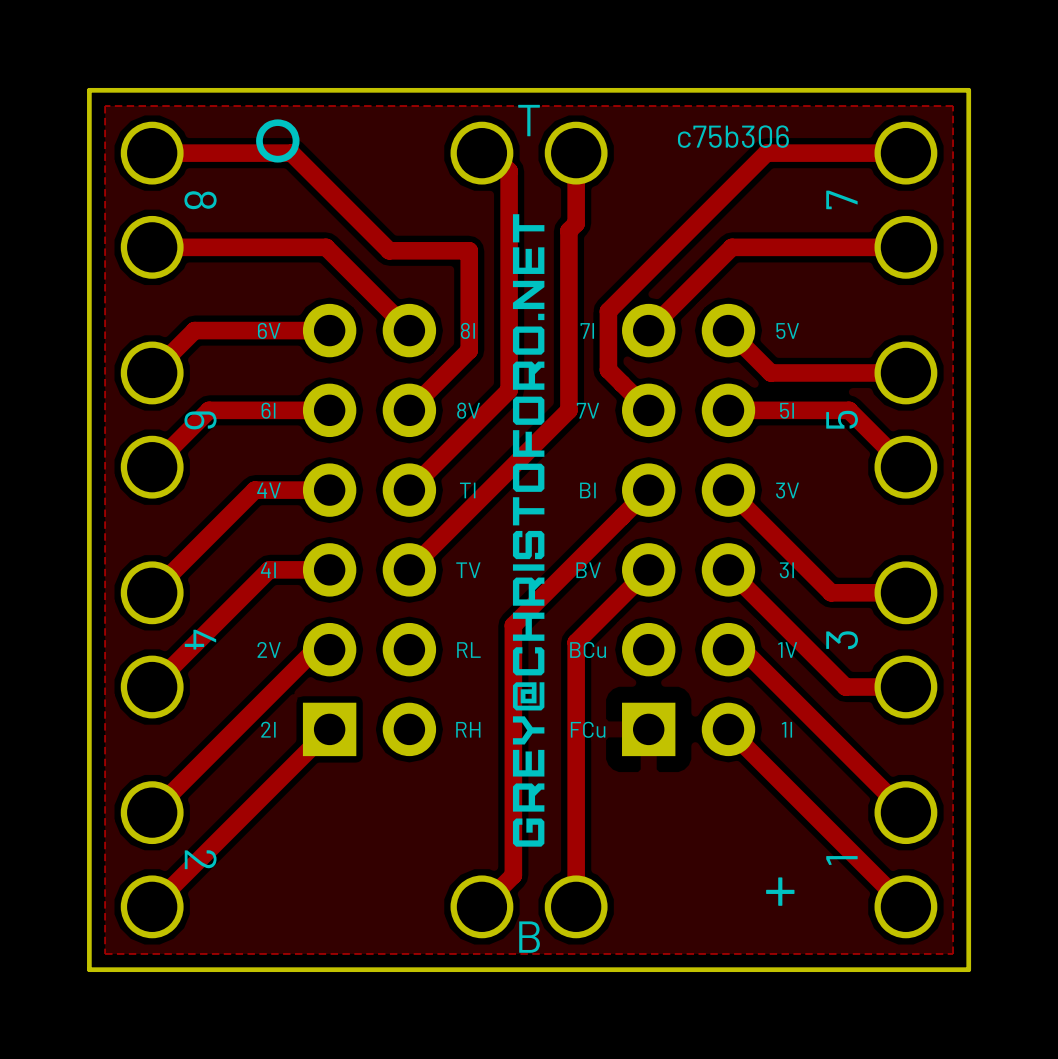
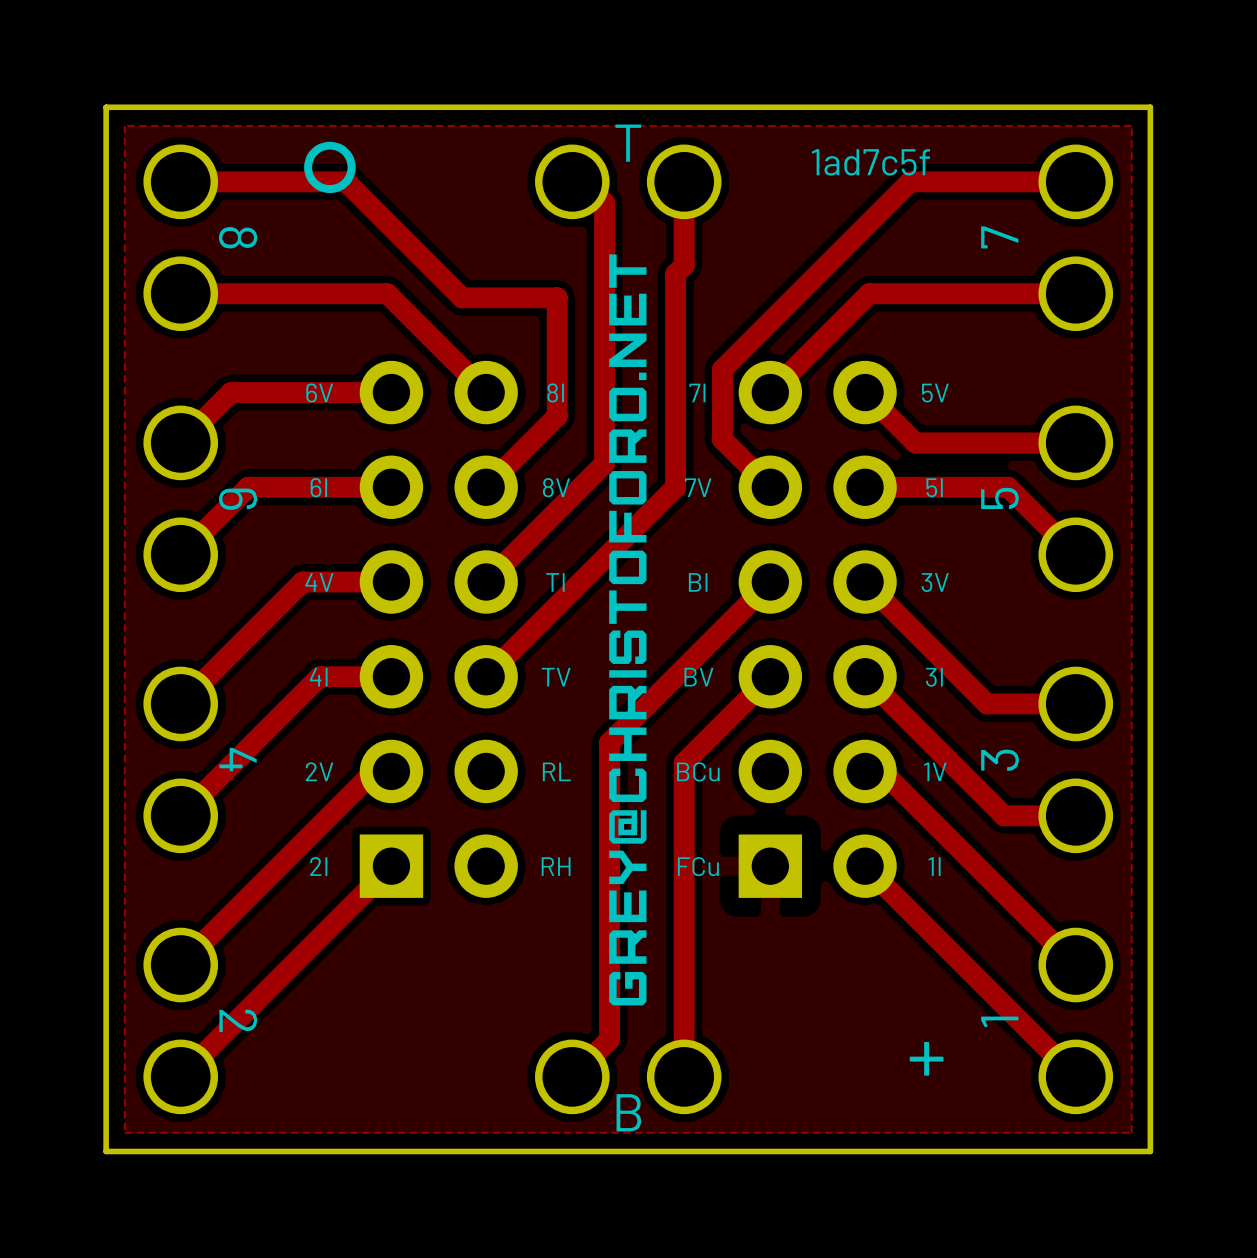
text: c75b306 (733, 136) -> 1ad7c5f (870, 162)

